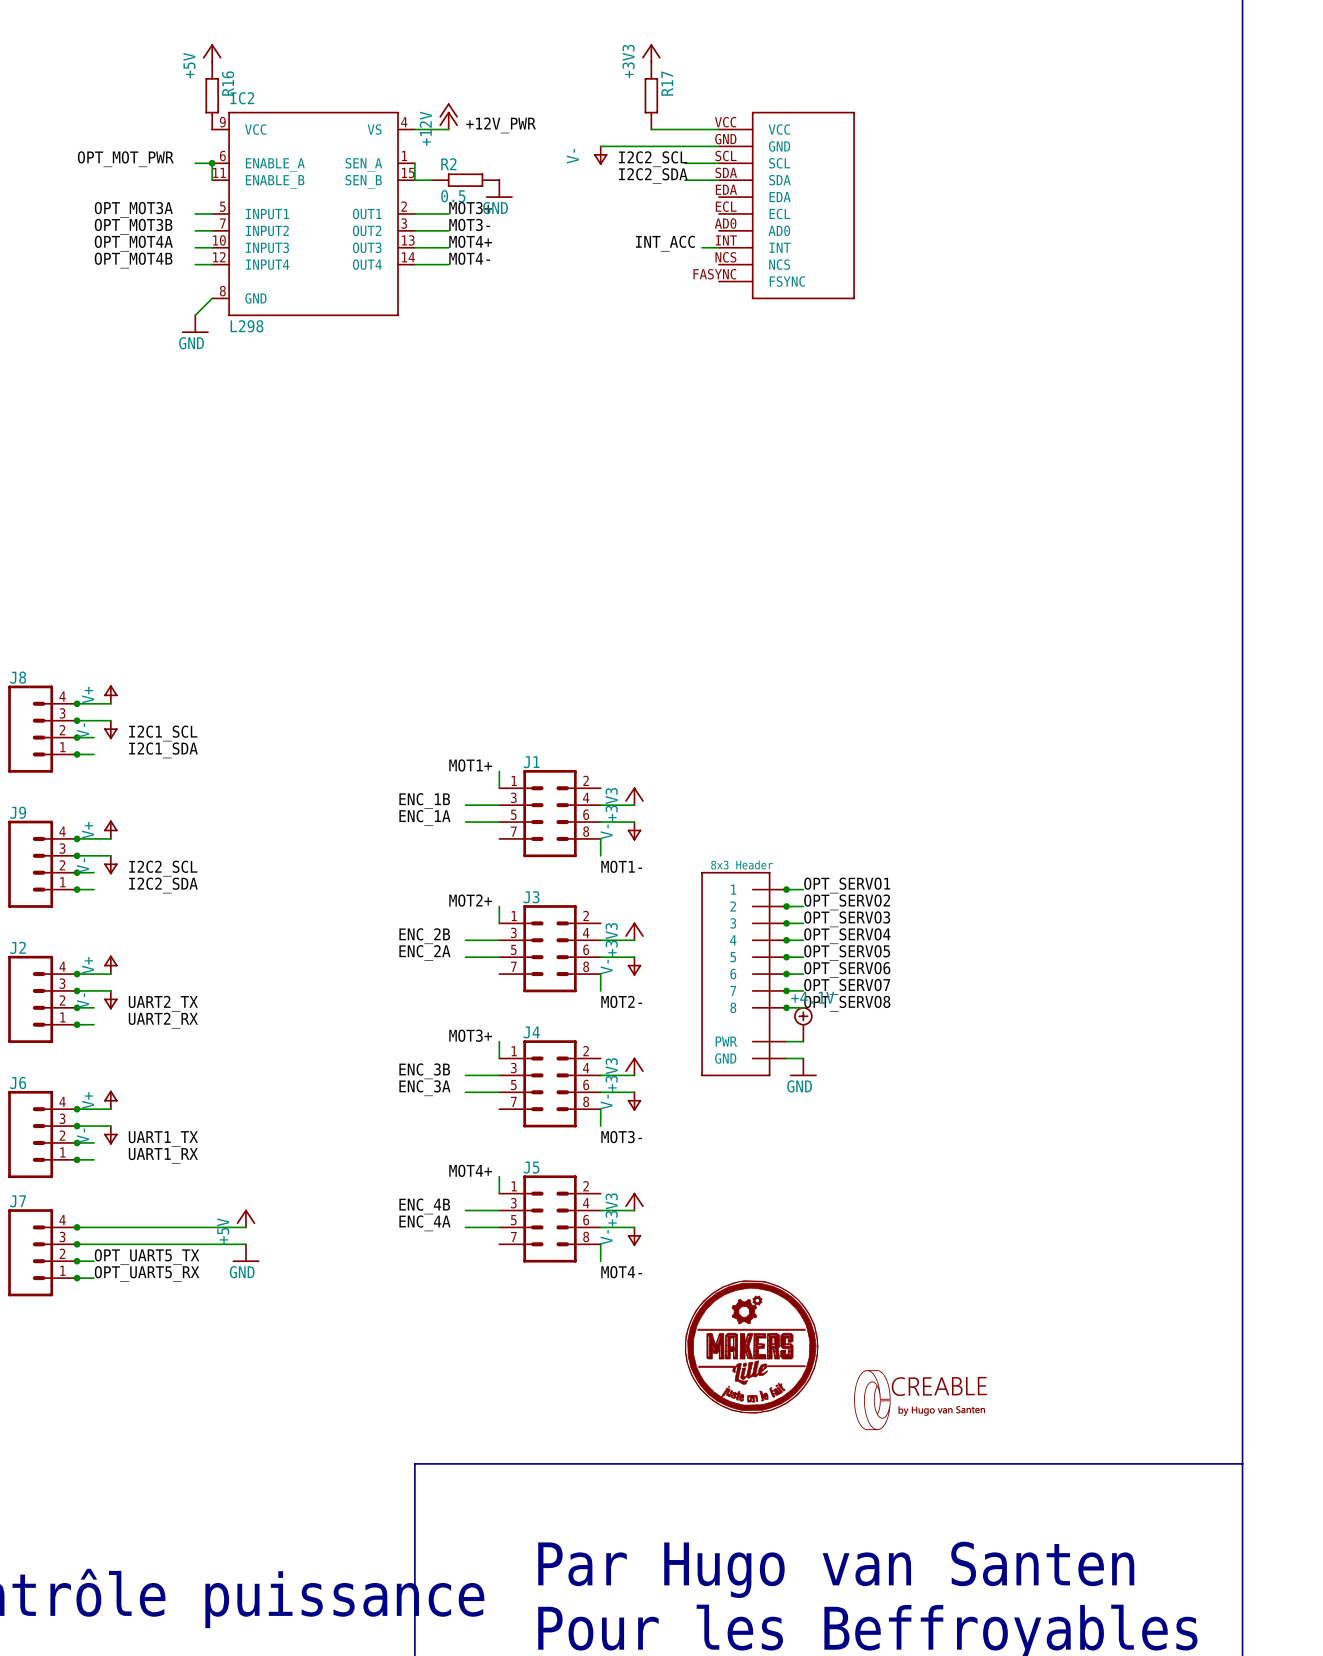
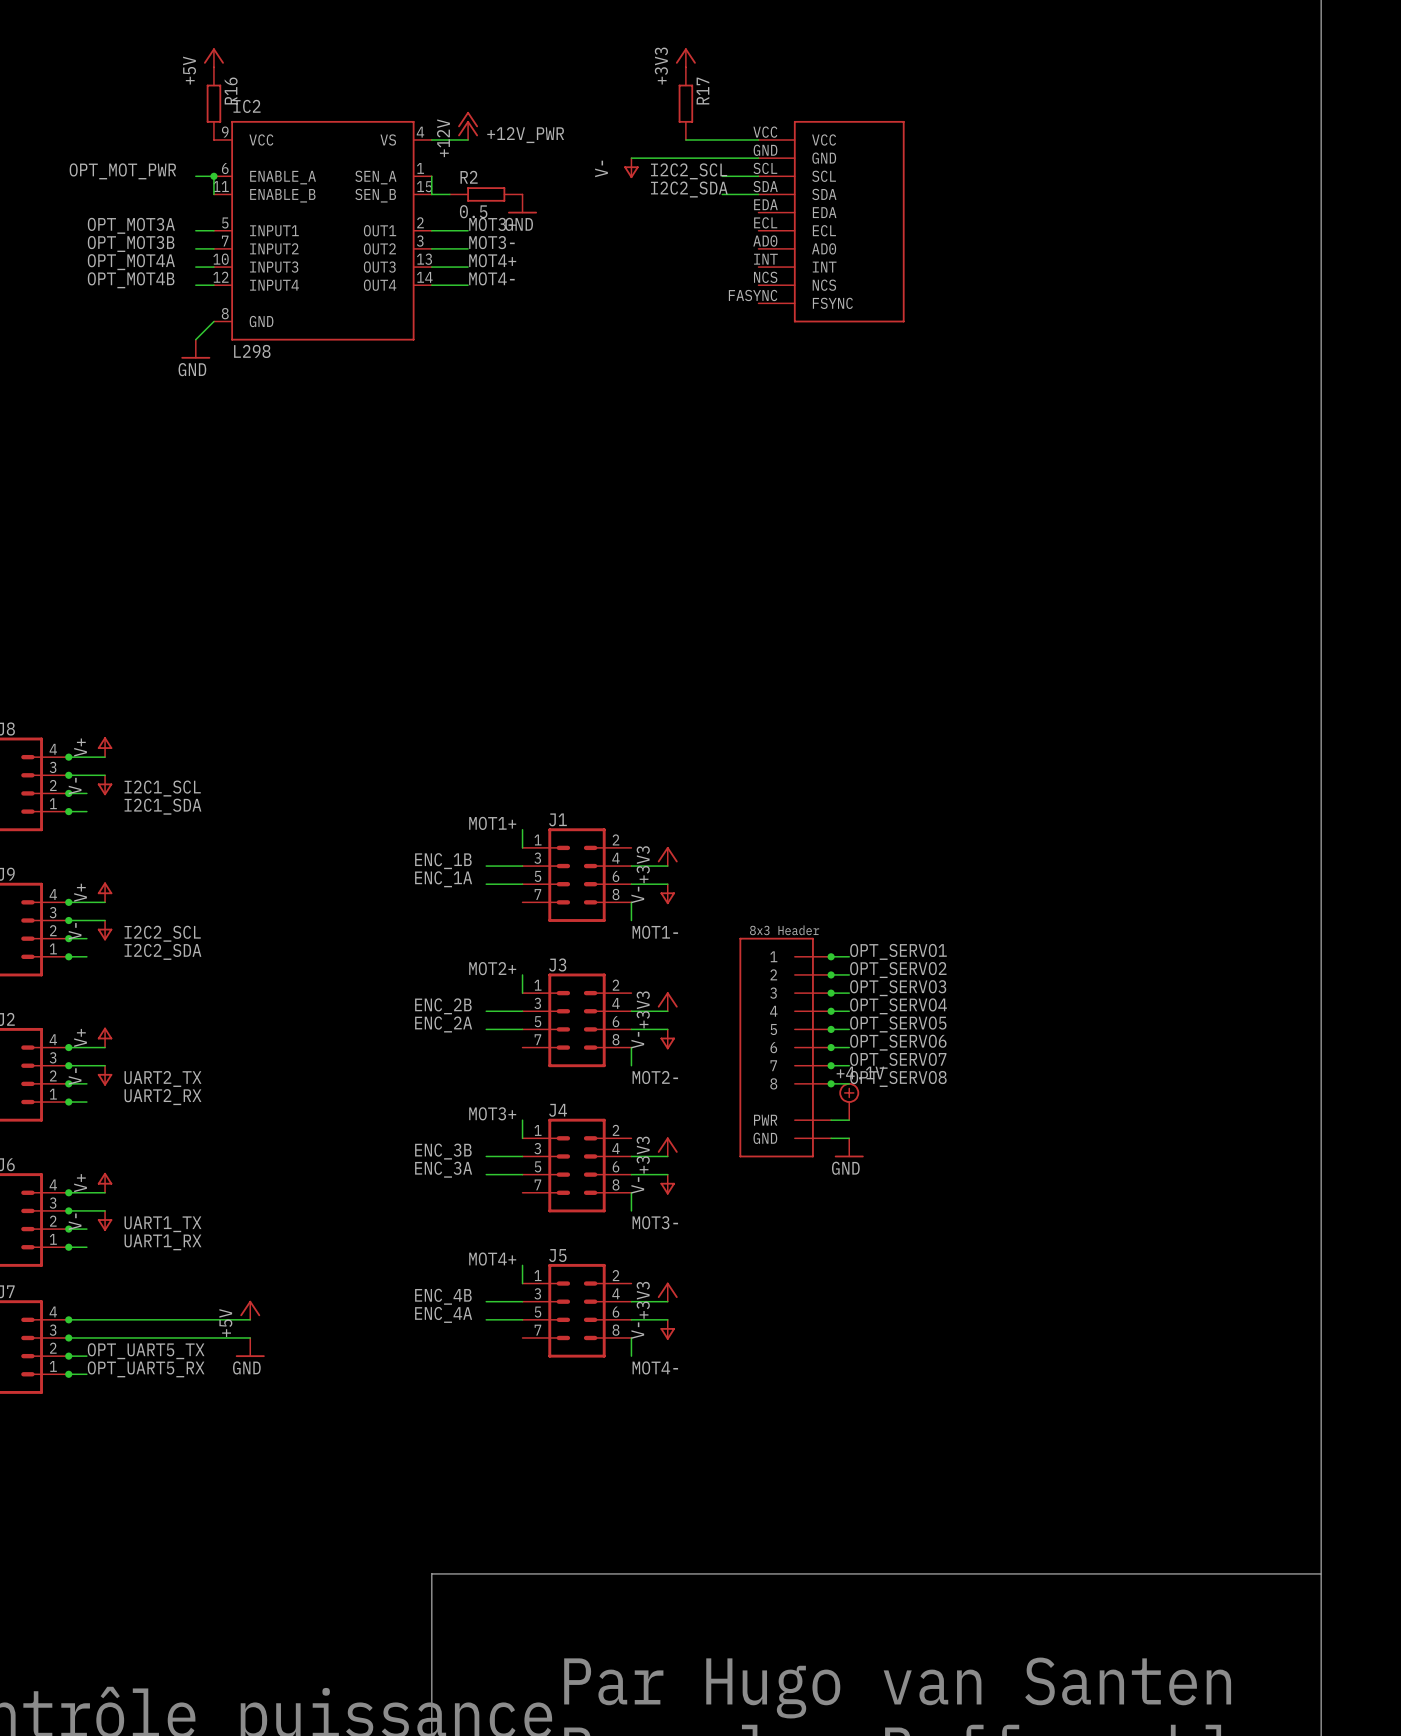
label: INT_ACC (665, 243) -> none
wire: (702, 247) (718, 247) -> none
part: (751, 1346) -> none
part: (920, 1400) -> none

